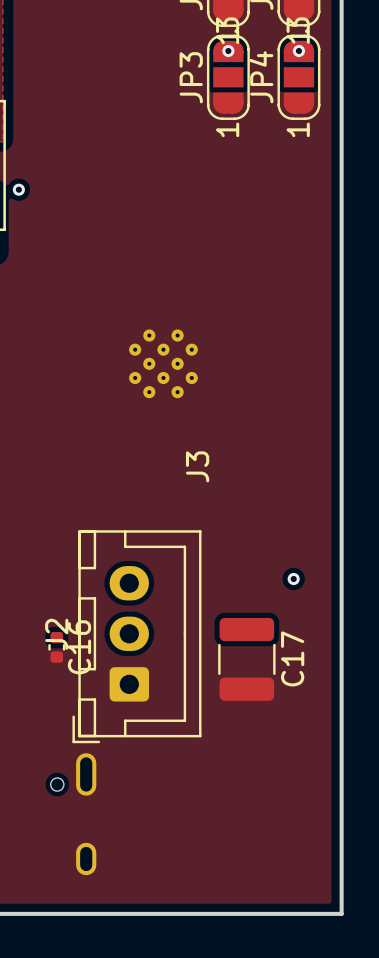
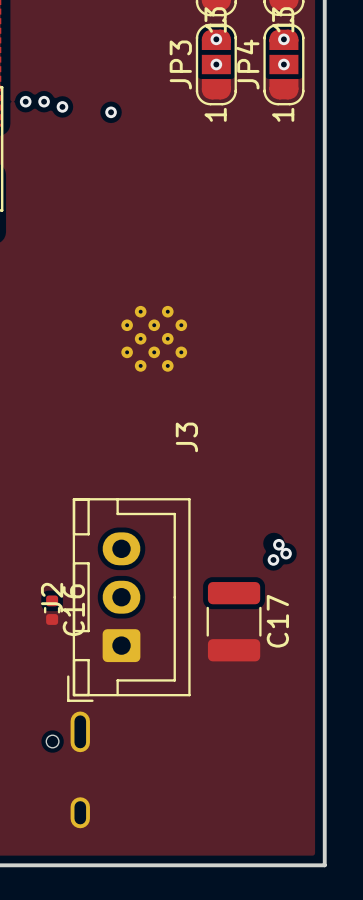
via: none -> (216, 64)
via: none -> (283, 64)
via: none -> (25, 101)
via: none -> (44, 101)
via: none -> (62, 106)
via: none -> (111, 112)
via: (18, 189) -> none
via: none -> (286, 553)
via: none -> (273, 559)

